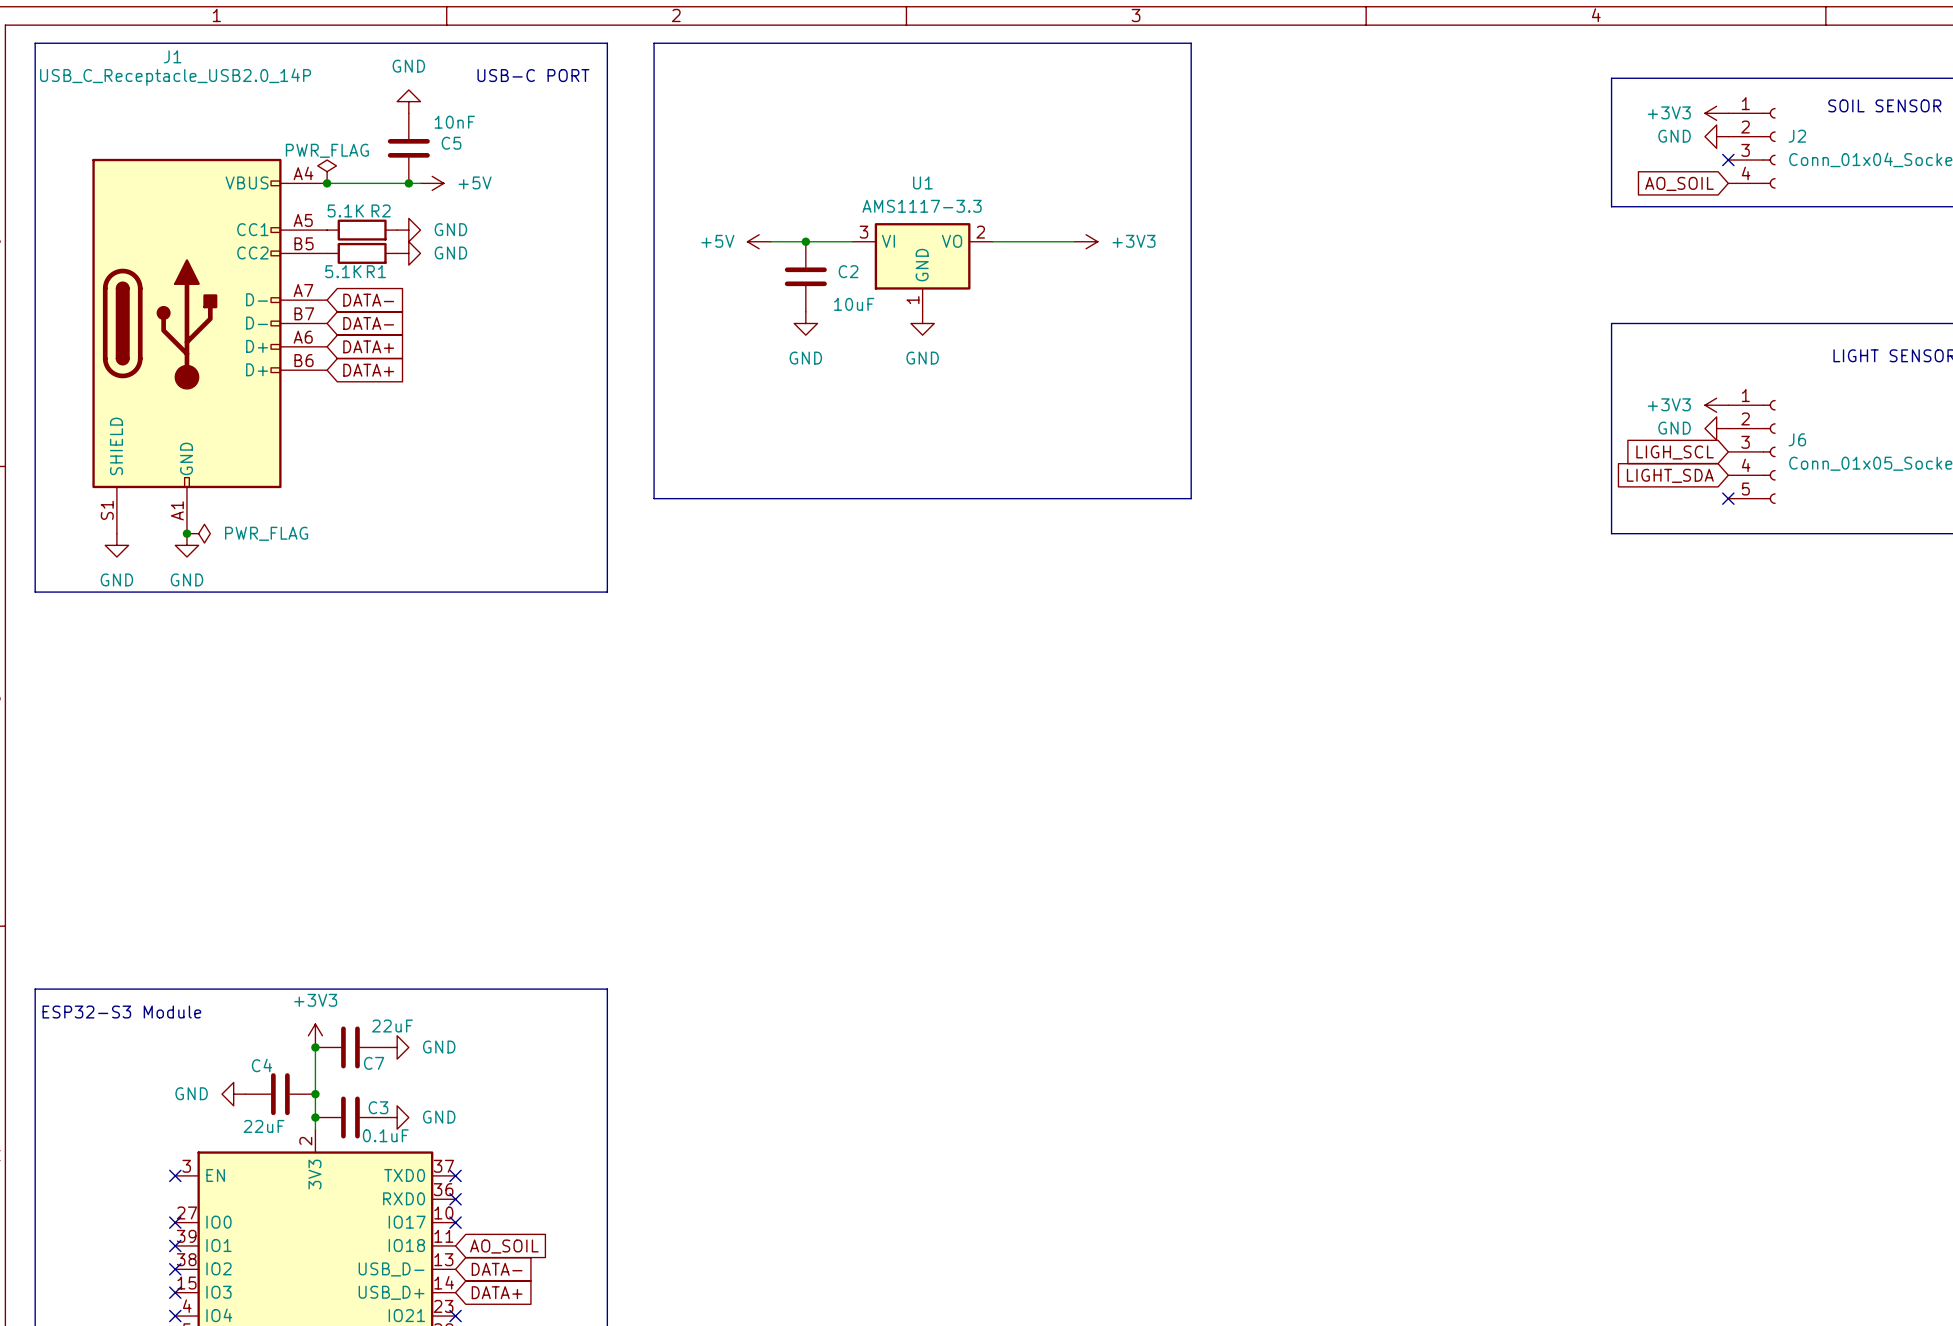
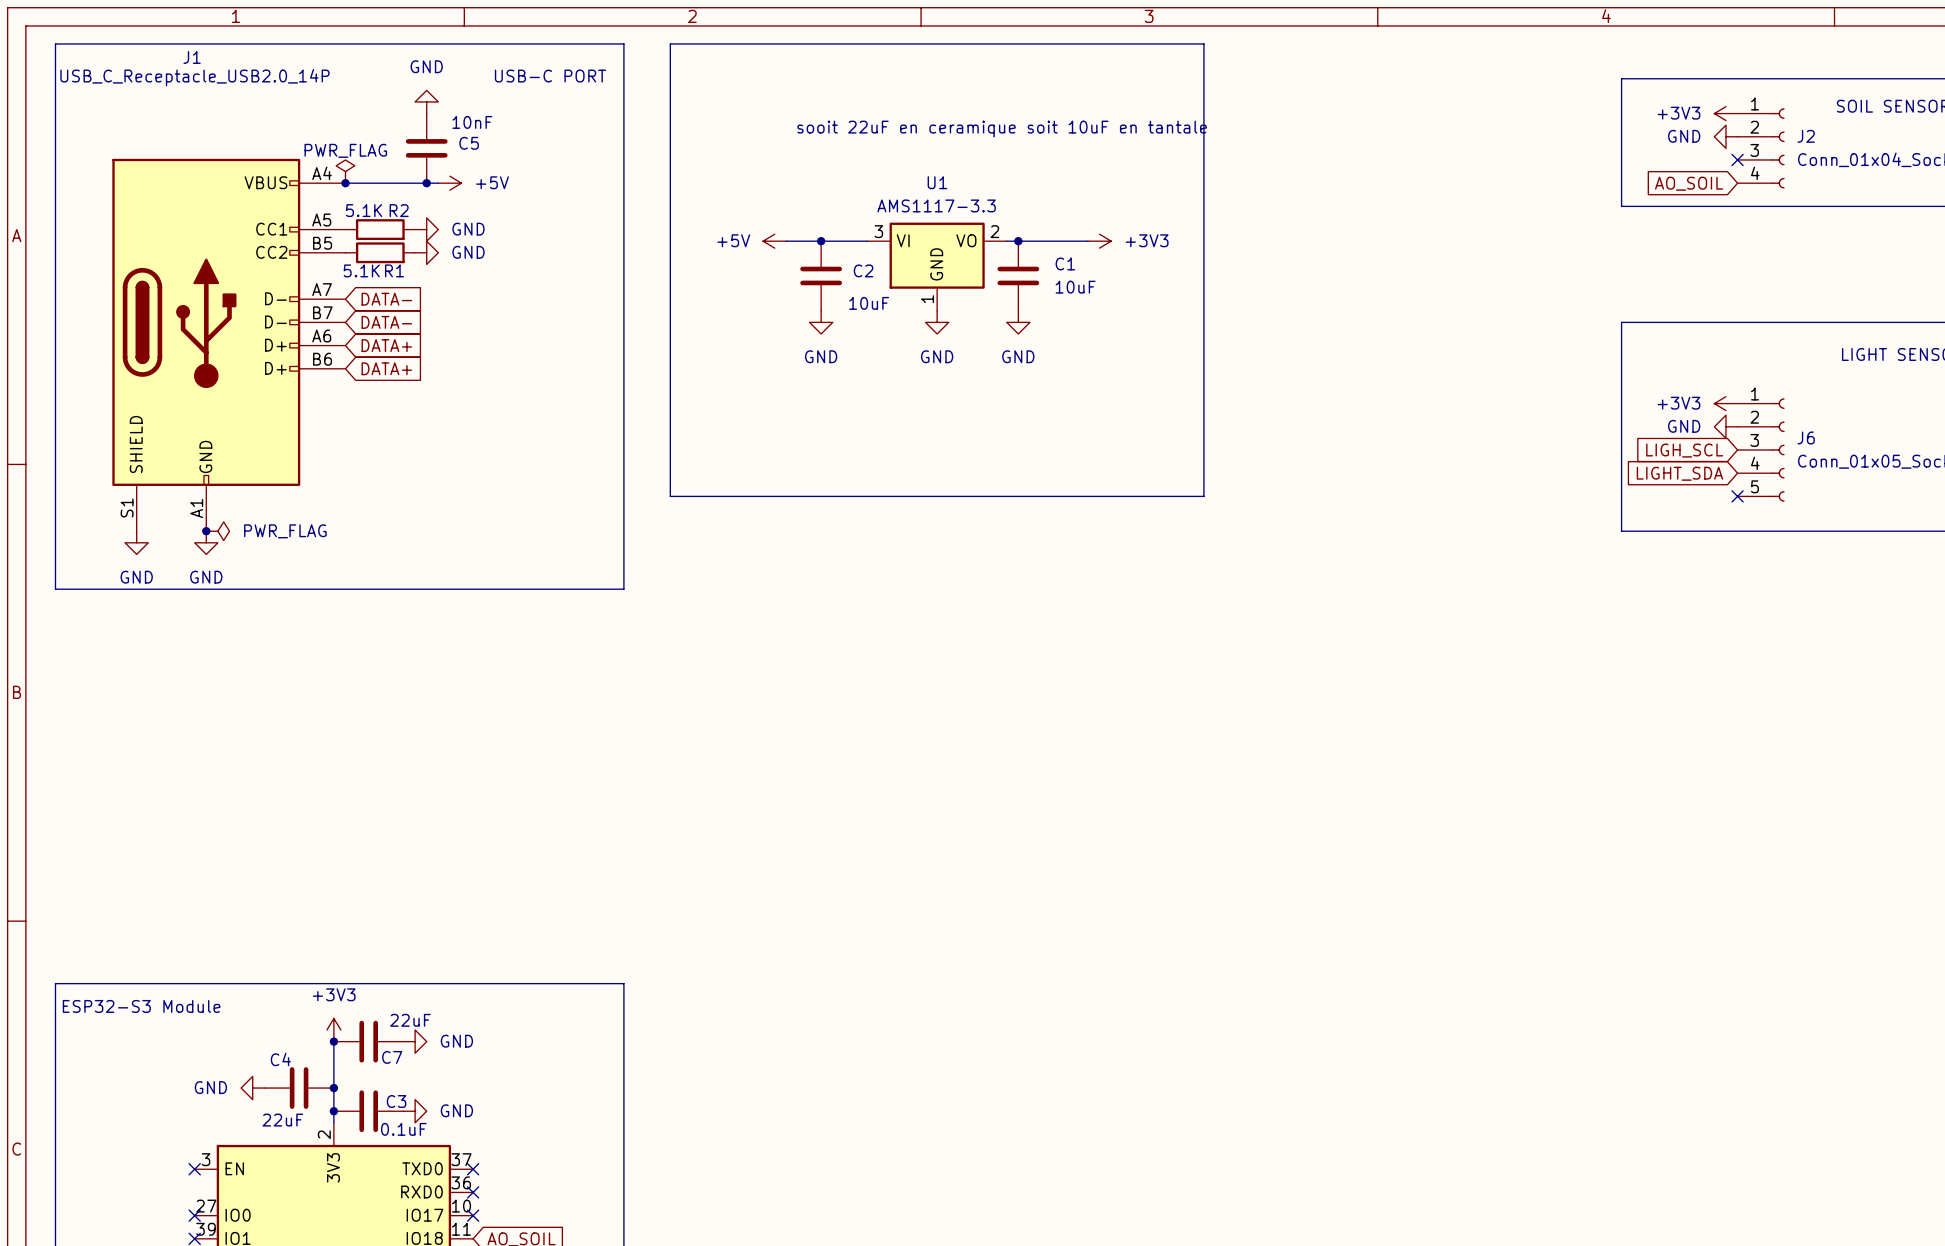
text: none -> sooit 22uF en ceramique soit 10uF en tantale (1002, 129)
junction: none -> (1018, 241)
C1: none -> 10uF (1018, 275)
power symbol: none -> GND (1018, 322)

